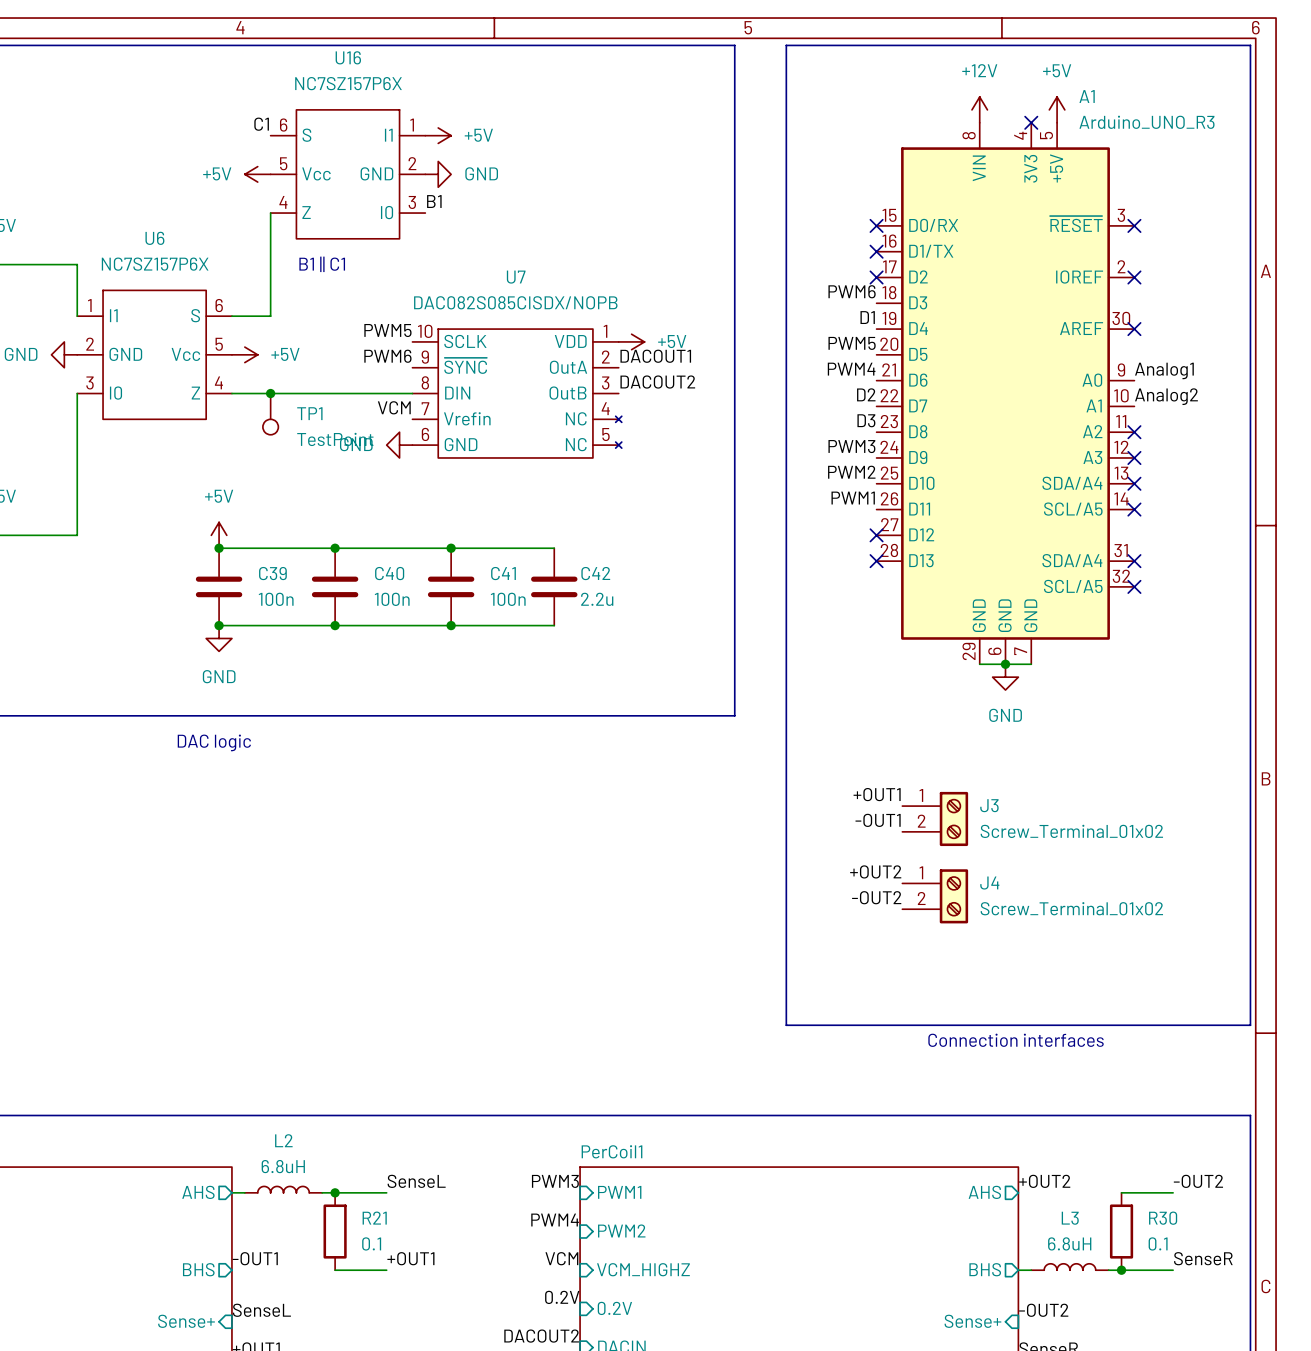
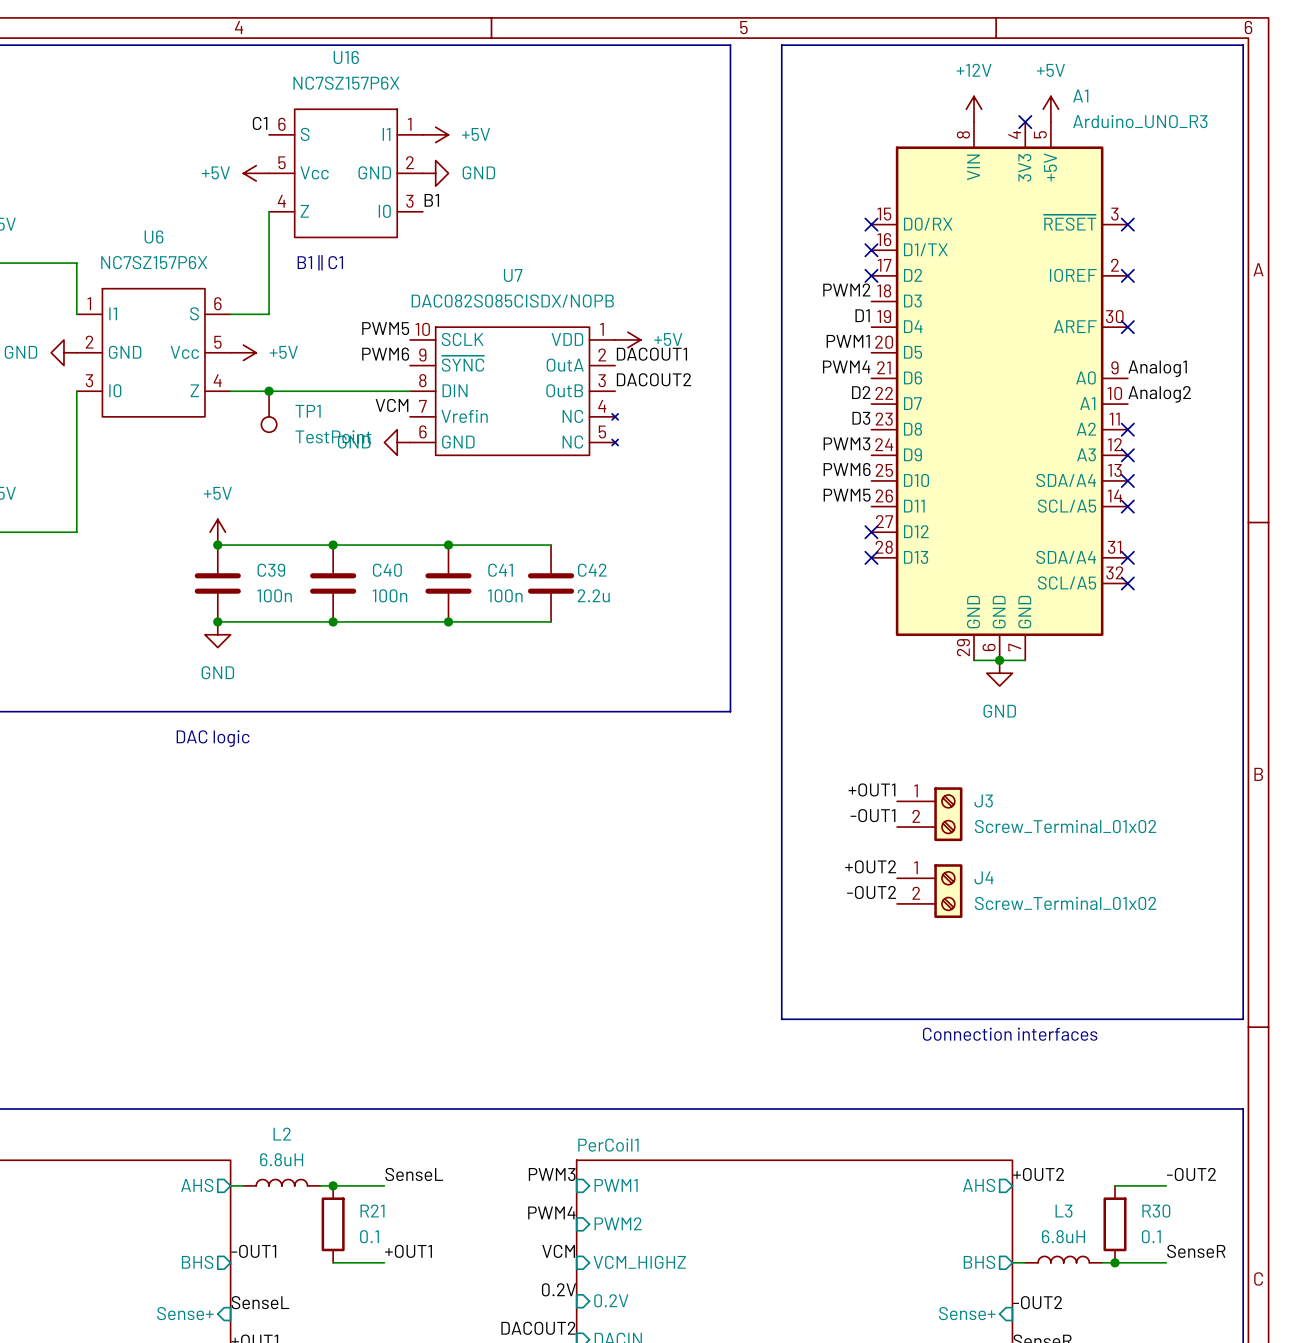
label: PWM6 (852, 291) -> PWM2 (846, 290)
label: PWM5 (852, 343) -> PWM1 (848, 341)
label: PWM2 (851, 472) -> PWM6 (847, 469)
label: PWM1 (853, 498) -> PWM5 (847, 495)

